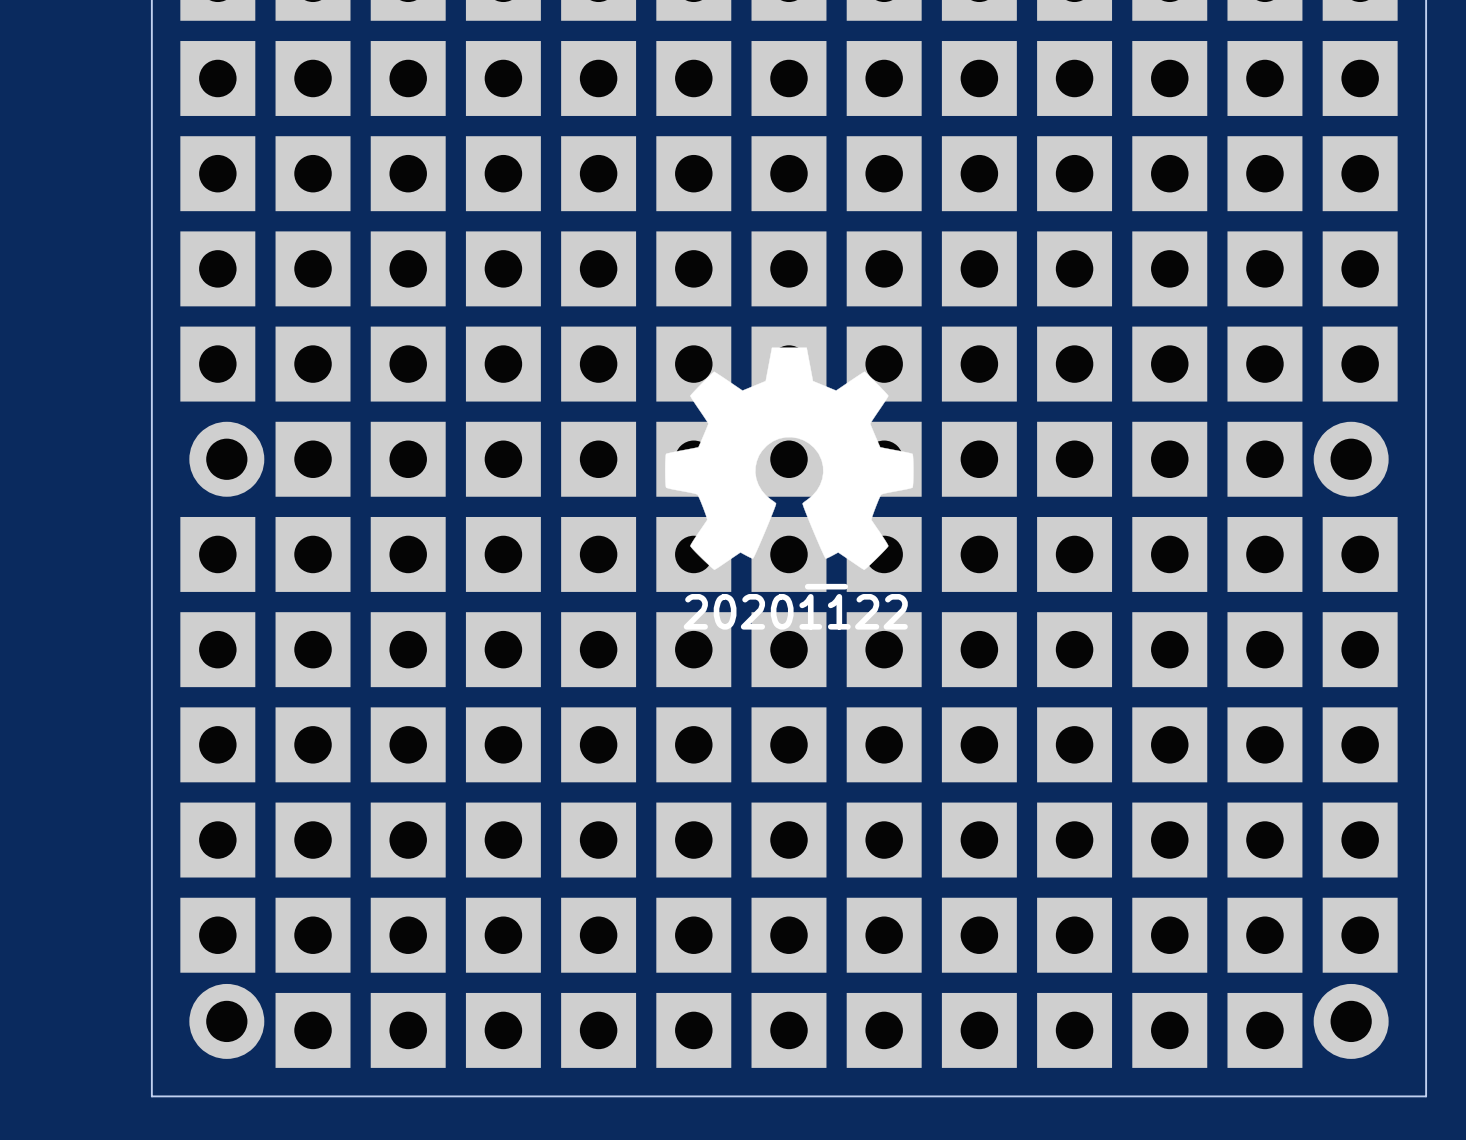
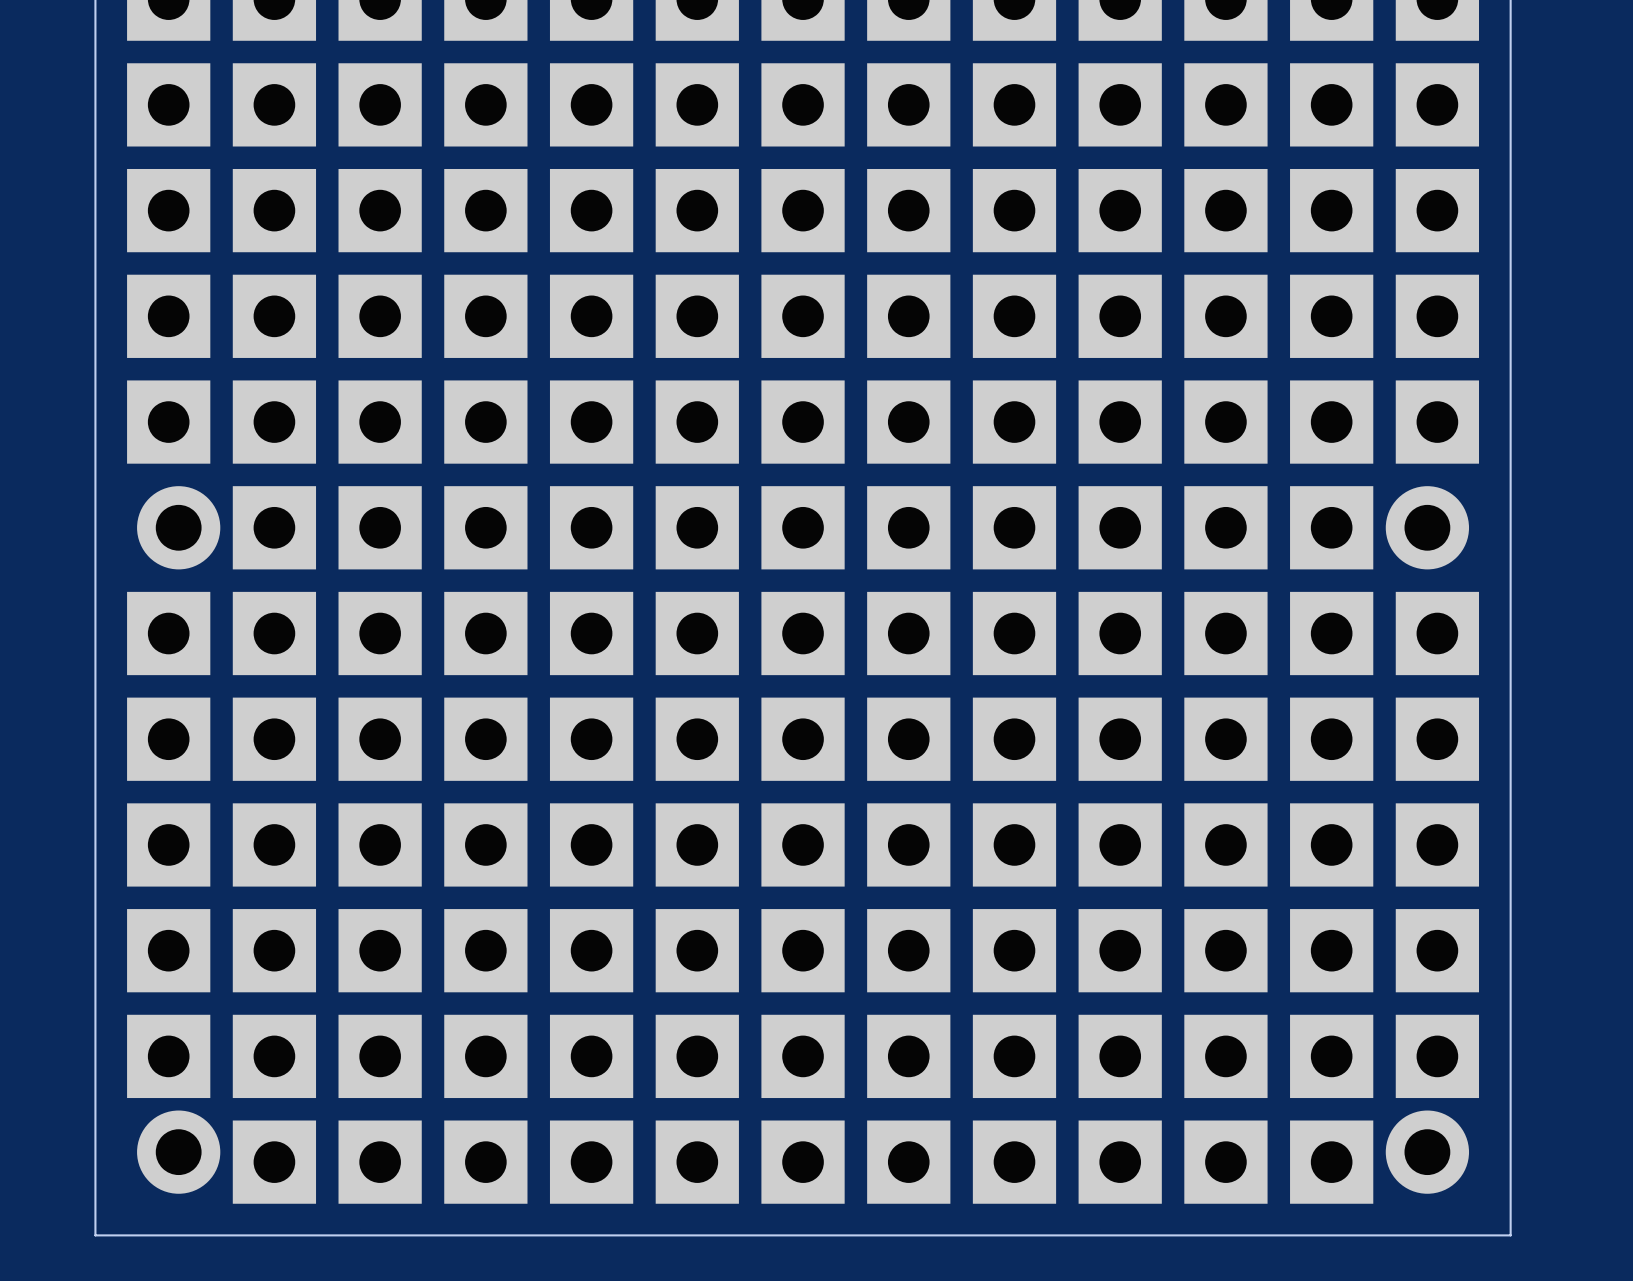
drawing: [665, 347, 914, 590] -> none

